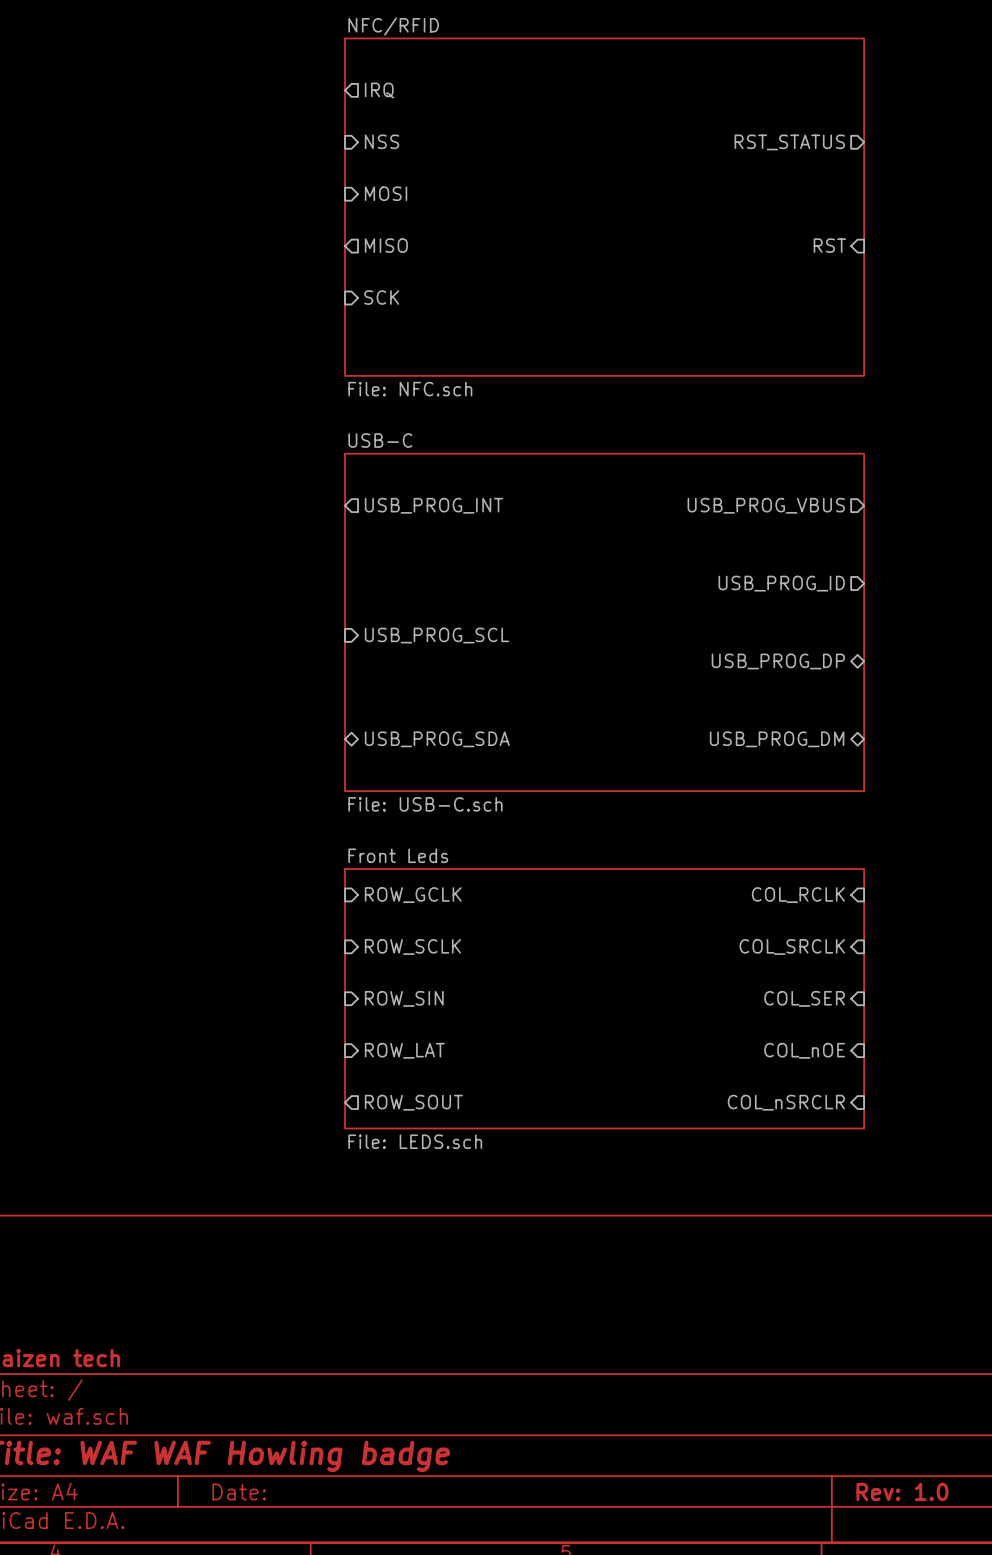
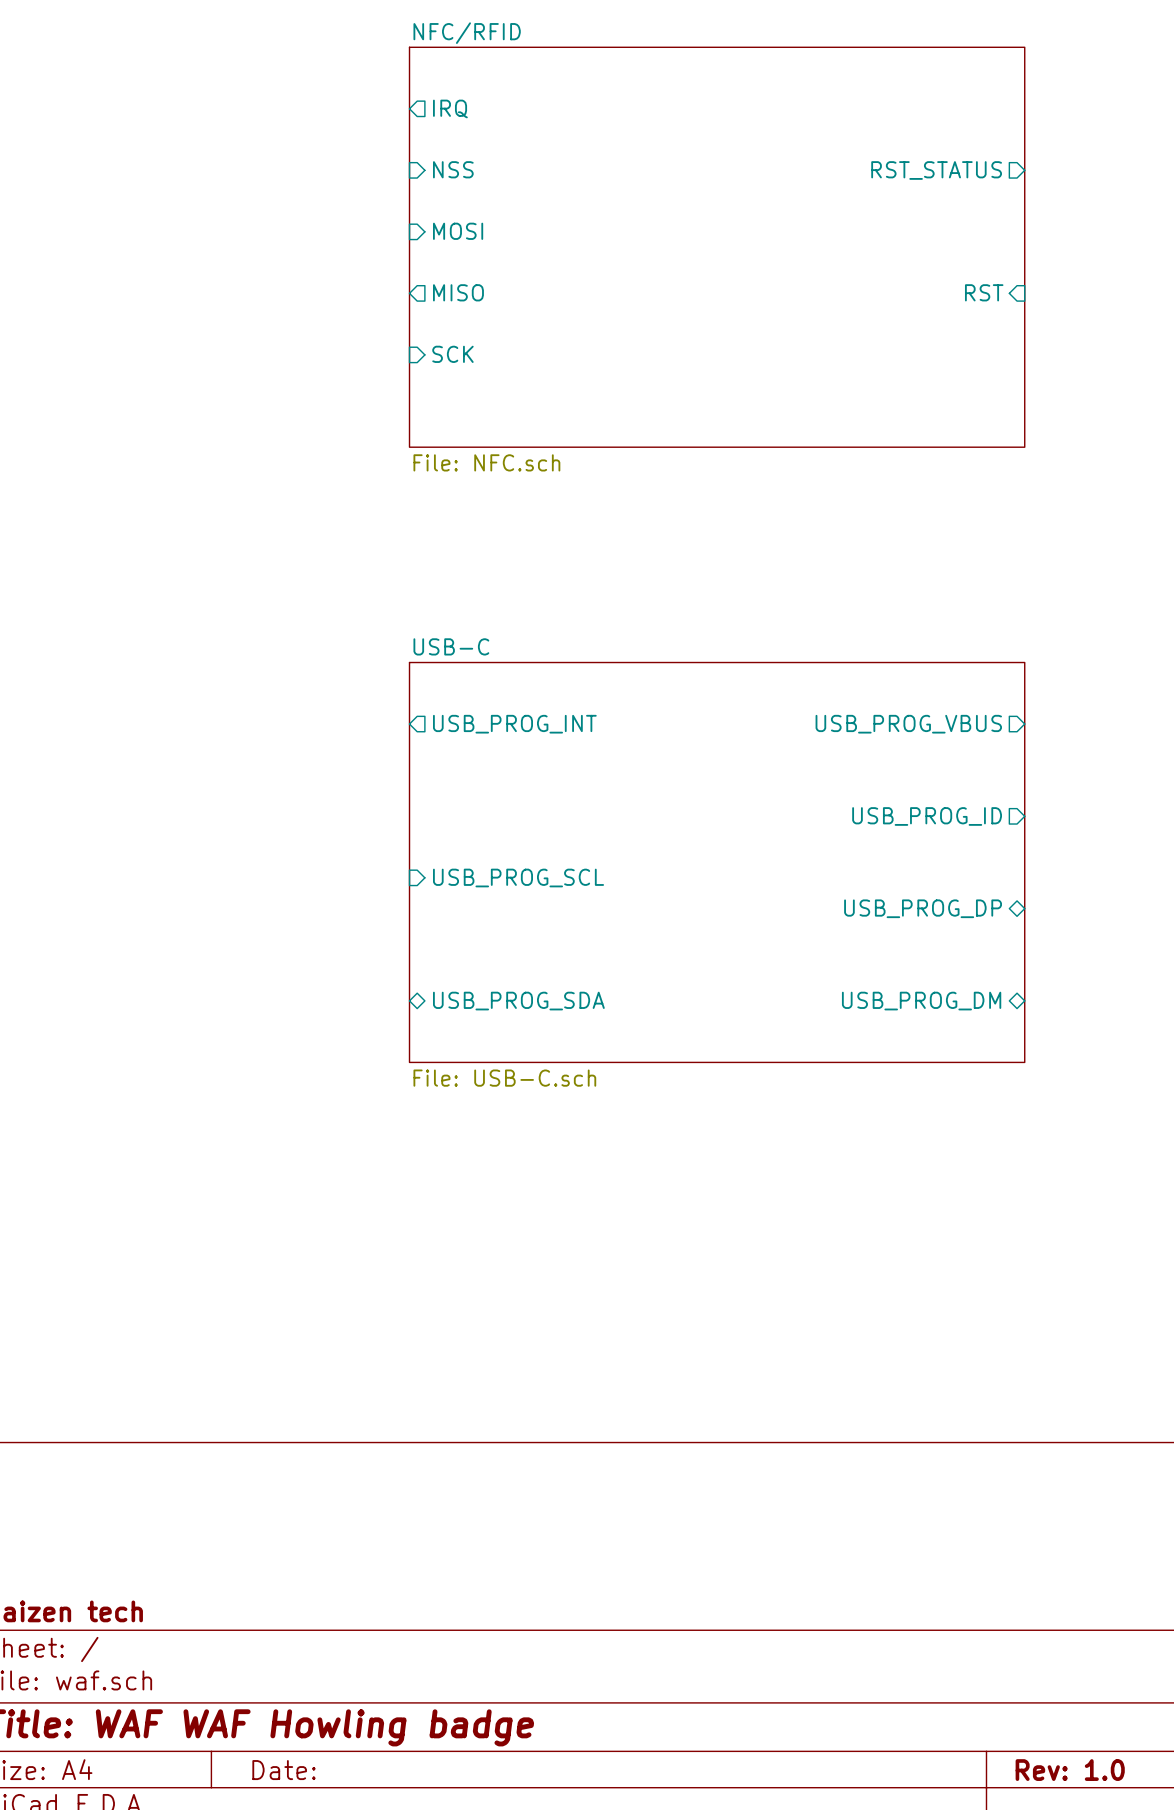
sheet pin position: USB_PROG_INT (433, 505) -> USB_PROG_INT (514, 724)
sheet pin position: USB_PROG_VBUS (766, 505) -> USB_PROG_VBUS (908, 724)
sheet pin position: USB_PROG_ID (781, 583) -> USB_PROG_ID (927, 816)
sheet USB-C position: (604, 622) -> (717, 862)
sheet pin: USB_PROG_SCL (437, 635) -> none
sheet pin position: USB_PROG_DP (778, 661) -> USB_PROG_DP (923, 908)
sheet pin shape: bidirectional (437, 739) -> input (518, 878)
sheet pin: USB_PROG_SDA (437, 739) -> USB_PROG_SCL (518, 878)
sheet pin position: USB_PROG_DM (777, 739) -> USB_PROG_DM (921, 1001)
sheet pin: none -> USB_PROG_SDA (518, 1001)
sheet pin: ROW_GCLK (413, 895) -> none
sheet pin: COL_RCLK (798, 895) -> none
sheet pin: ROW_SCLK (412, 946) -> none
sheet pin: COL_SRCLK (792, 946) -> none
sheet pin: ROW_SIN (404, 998) -> none
sheet Front Leds: File: LEDS.sch (604, 998) -> none
sheet pin: COL_SER (804, 998) -> none
sheet pin: ROW_LAT (404, 1050) -> none
sheet pin: COL_nOE (804, 1050) -> none
sheet pin: ROW_SOUT (413, 1102) -> none
sheet pin: COL_nSRCLR (786, 1102) -> none

